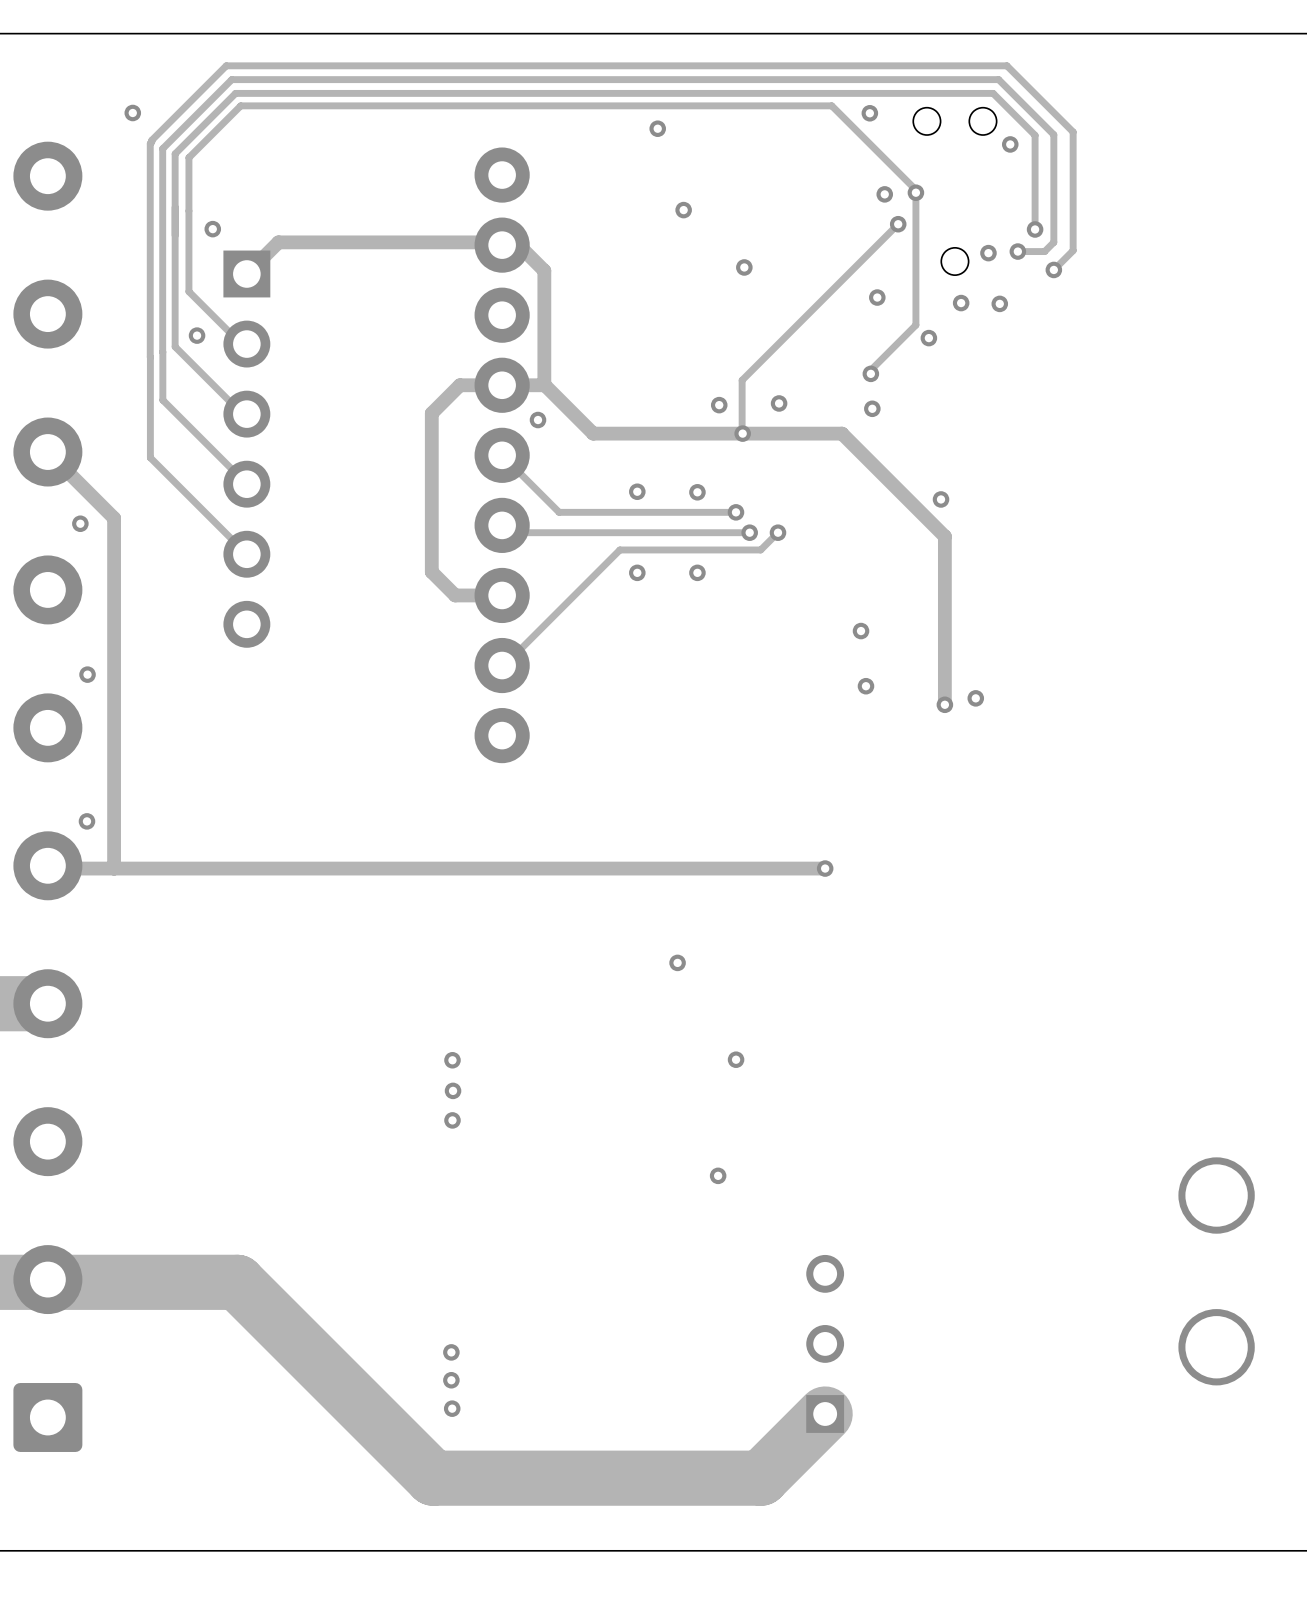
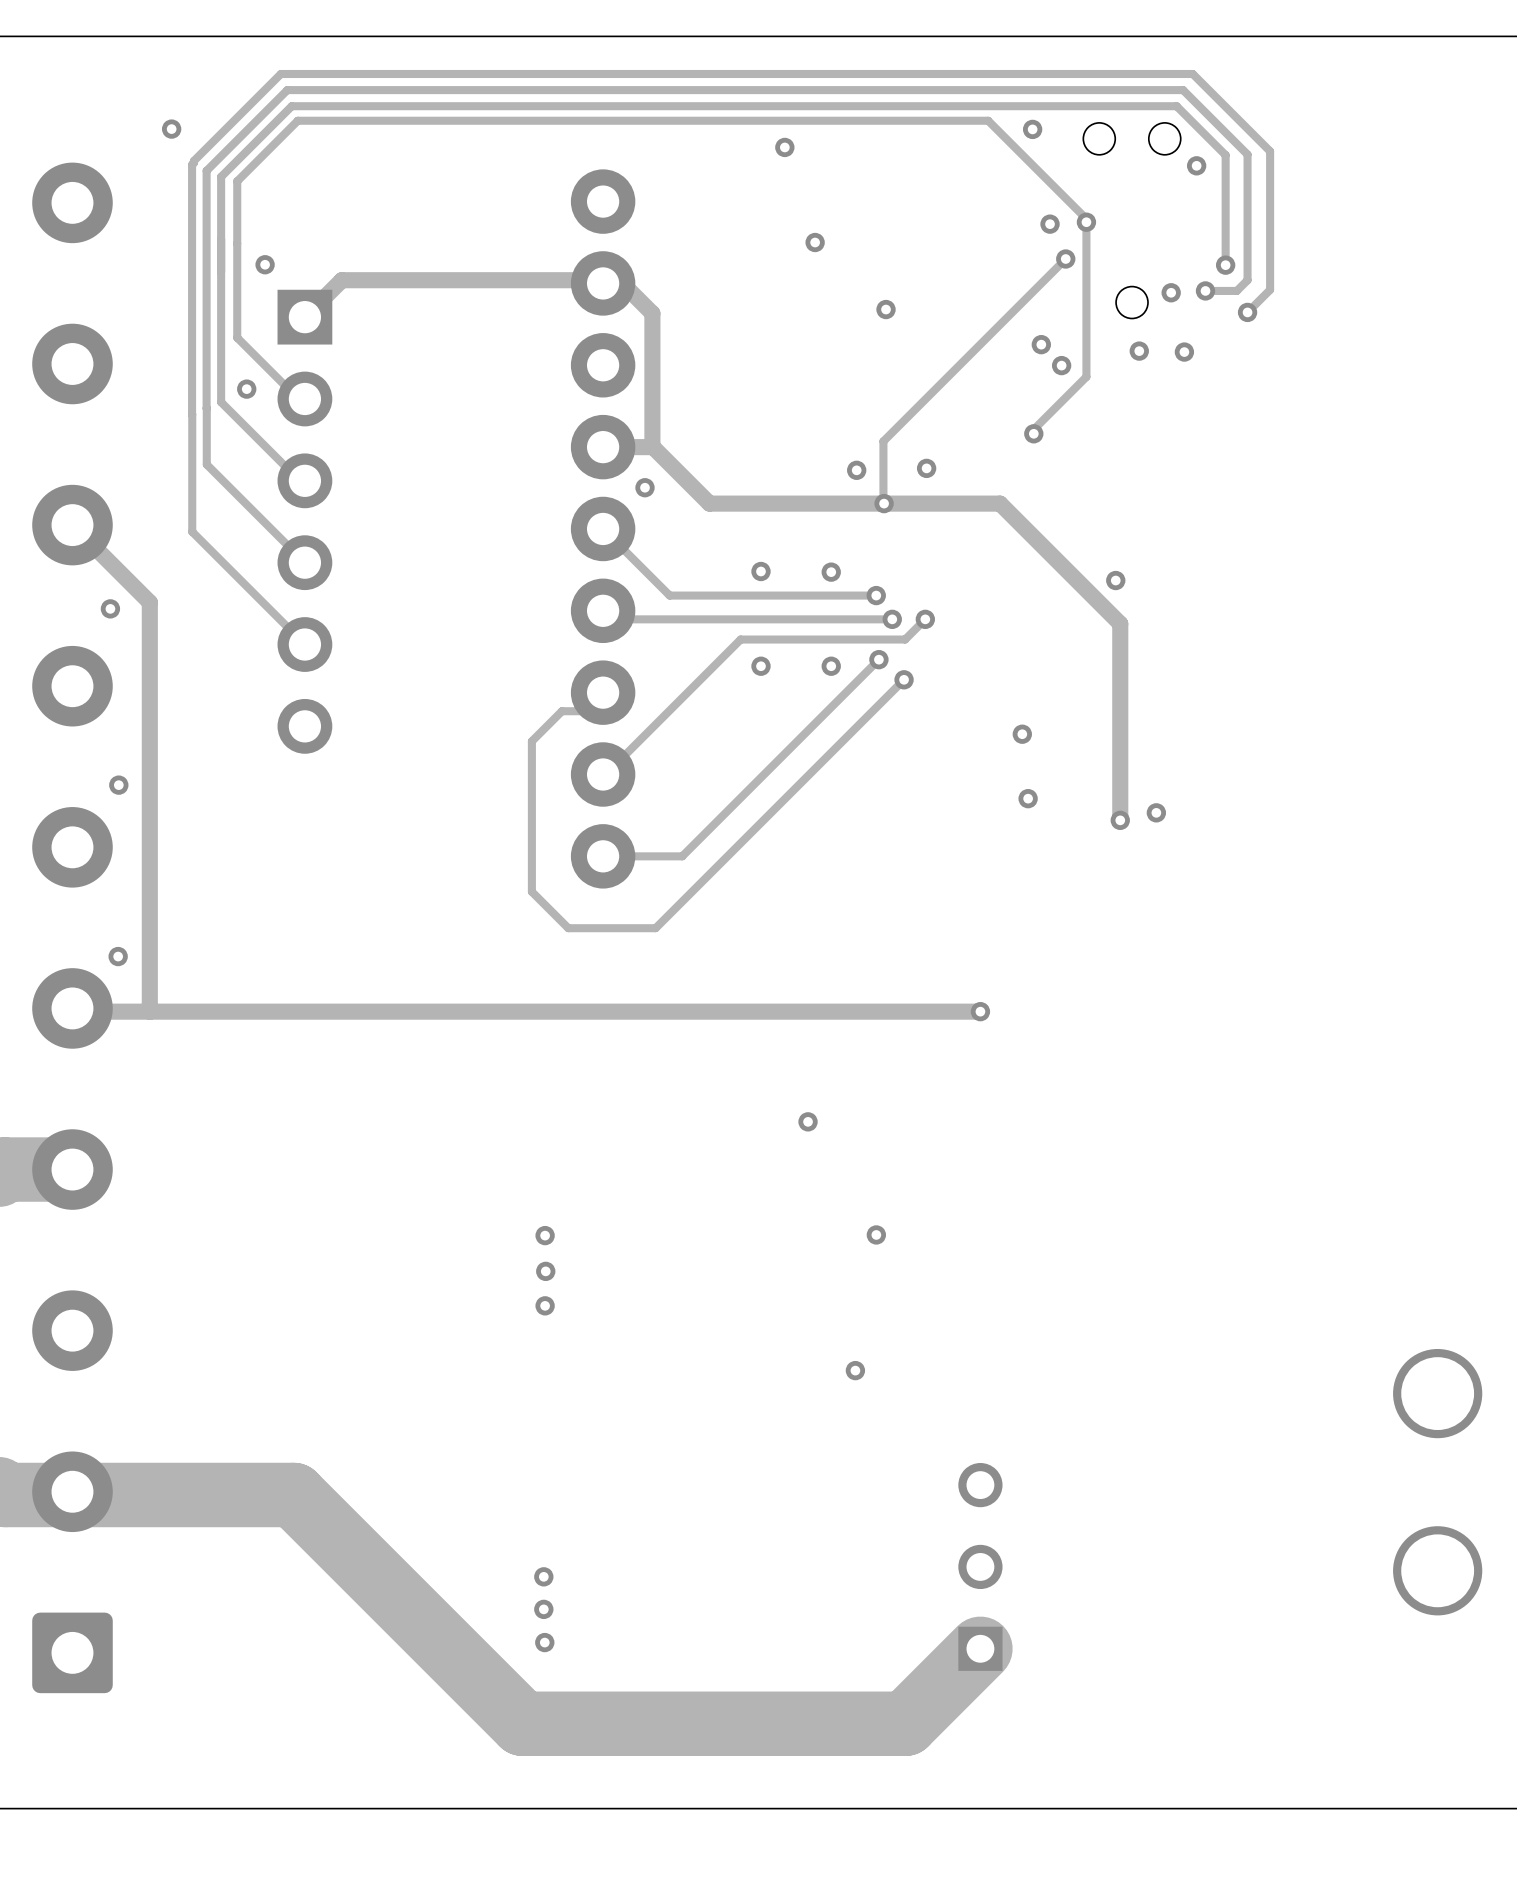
via position: (928, 338) -> (1061, 365)
track: (502, 385) (459, 385) (431, 413) (431, 572) (455, 595) (502, 595) -> none
via: (872, 408) -> none
track: none -> (878, 659) (682, 856) (603, 856)
via: none -> (878, 659)
track: none -> (904, 679) (655, 928) (568, 928) (531, 891) (531, 741) (561, 711) (603, 711)
via: none -> (904, 679)

